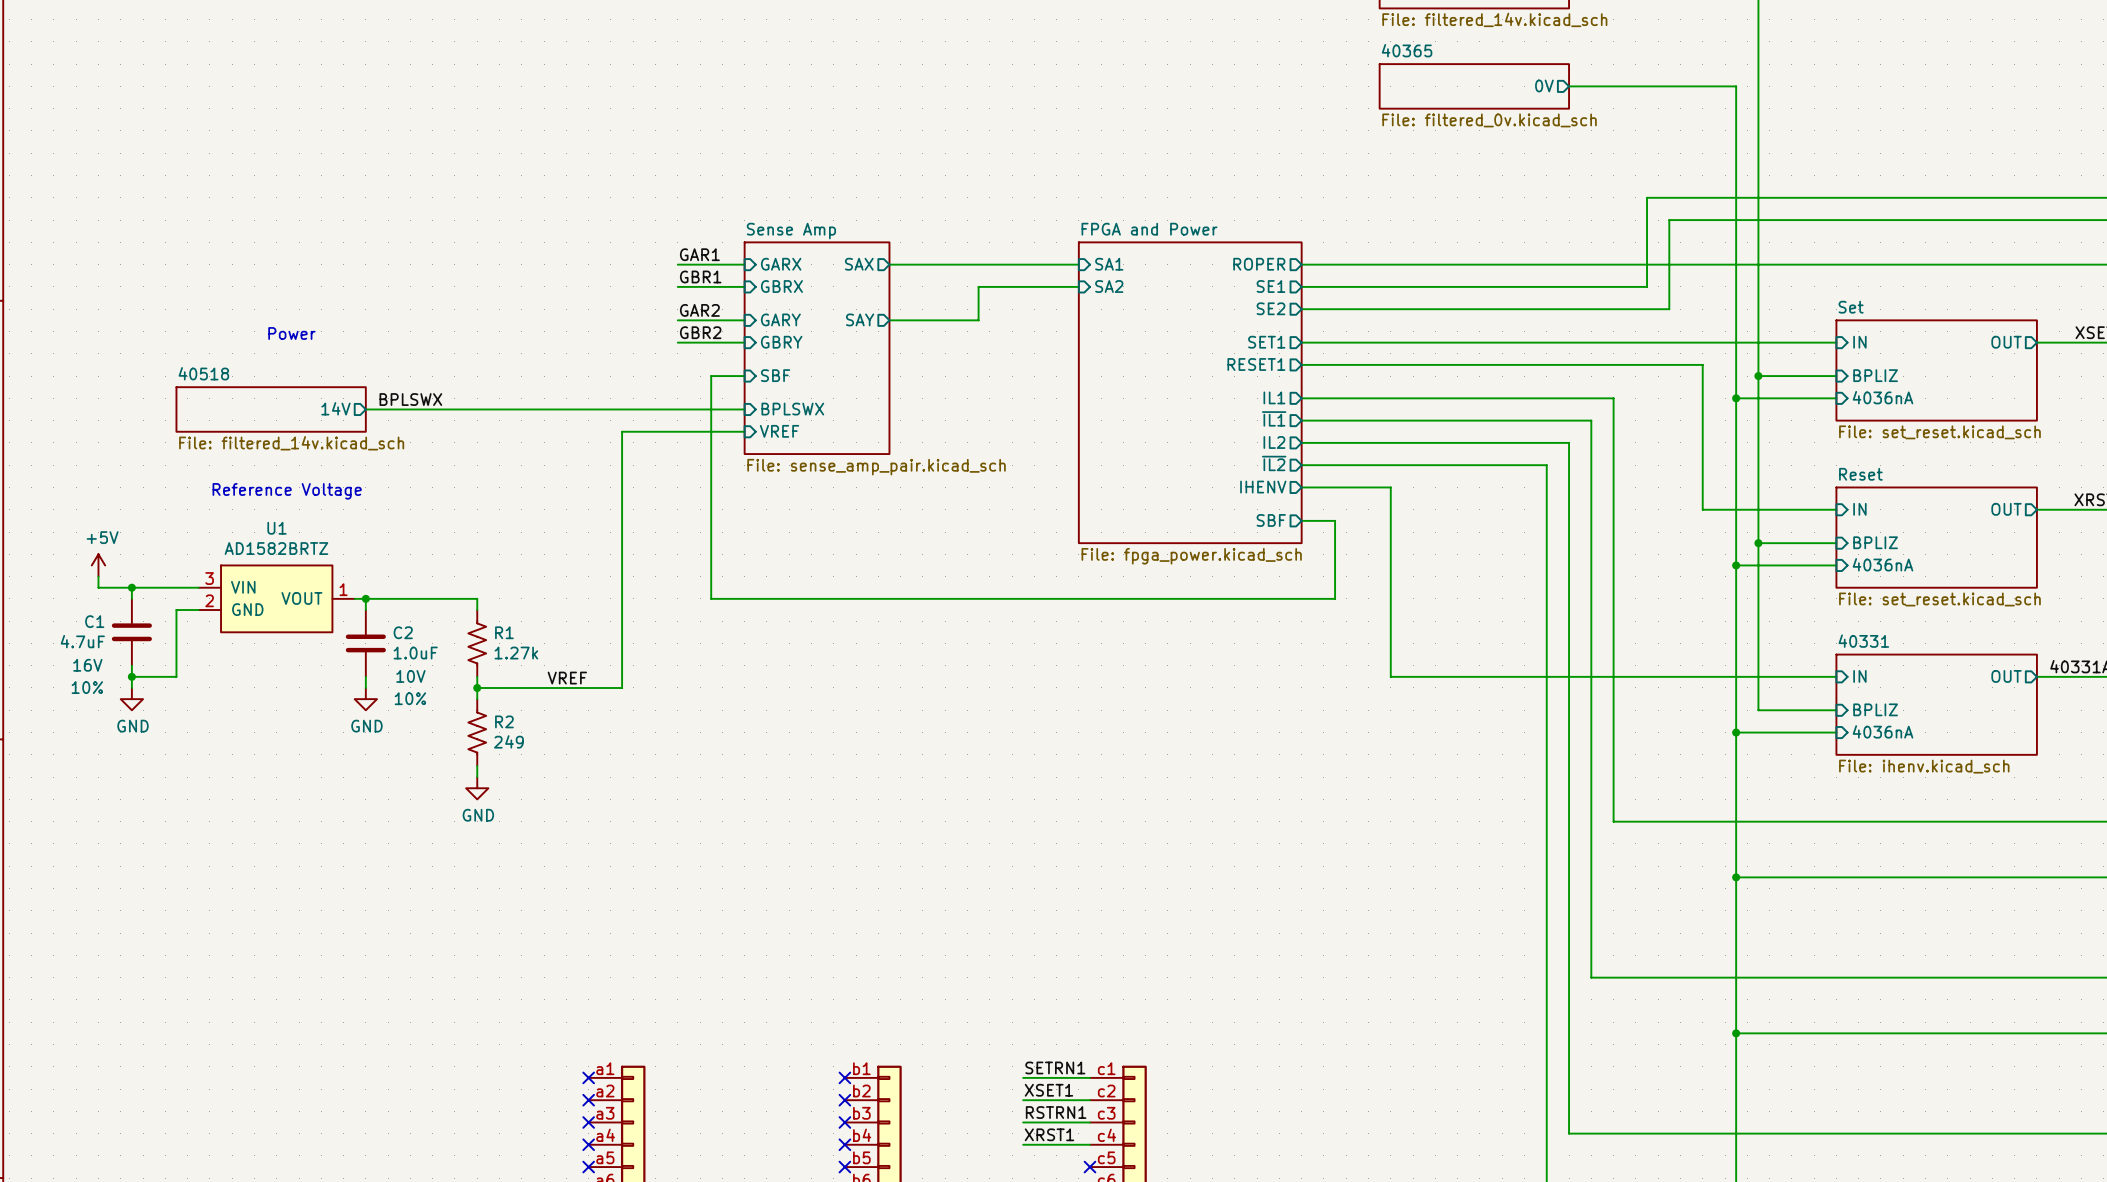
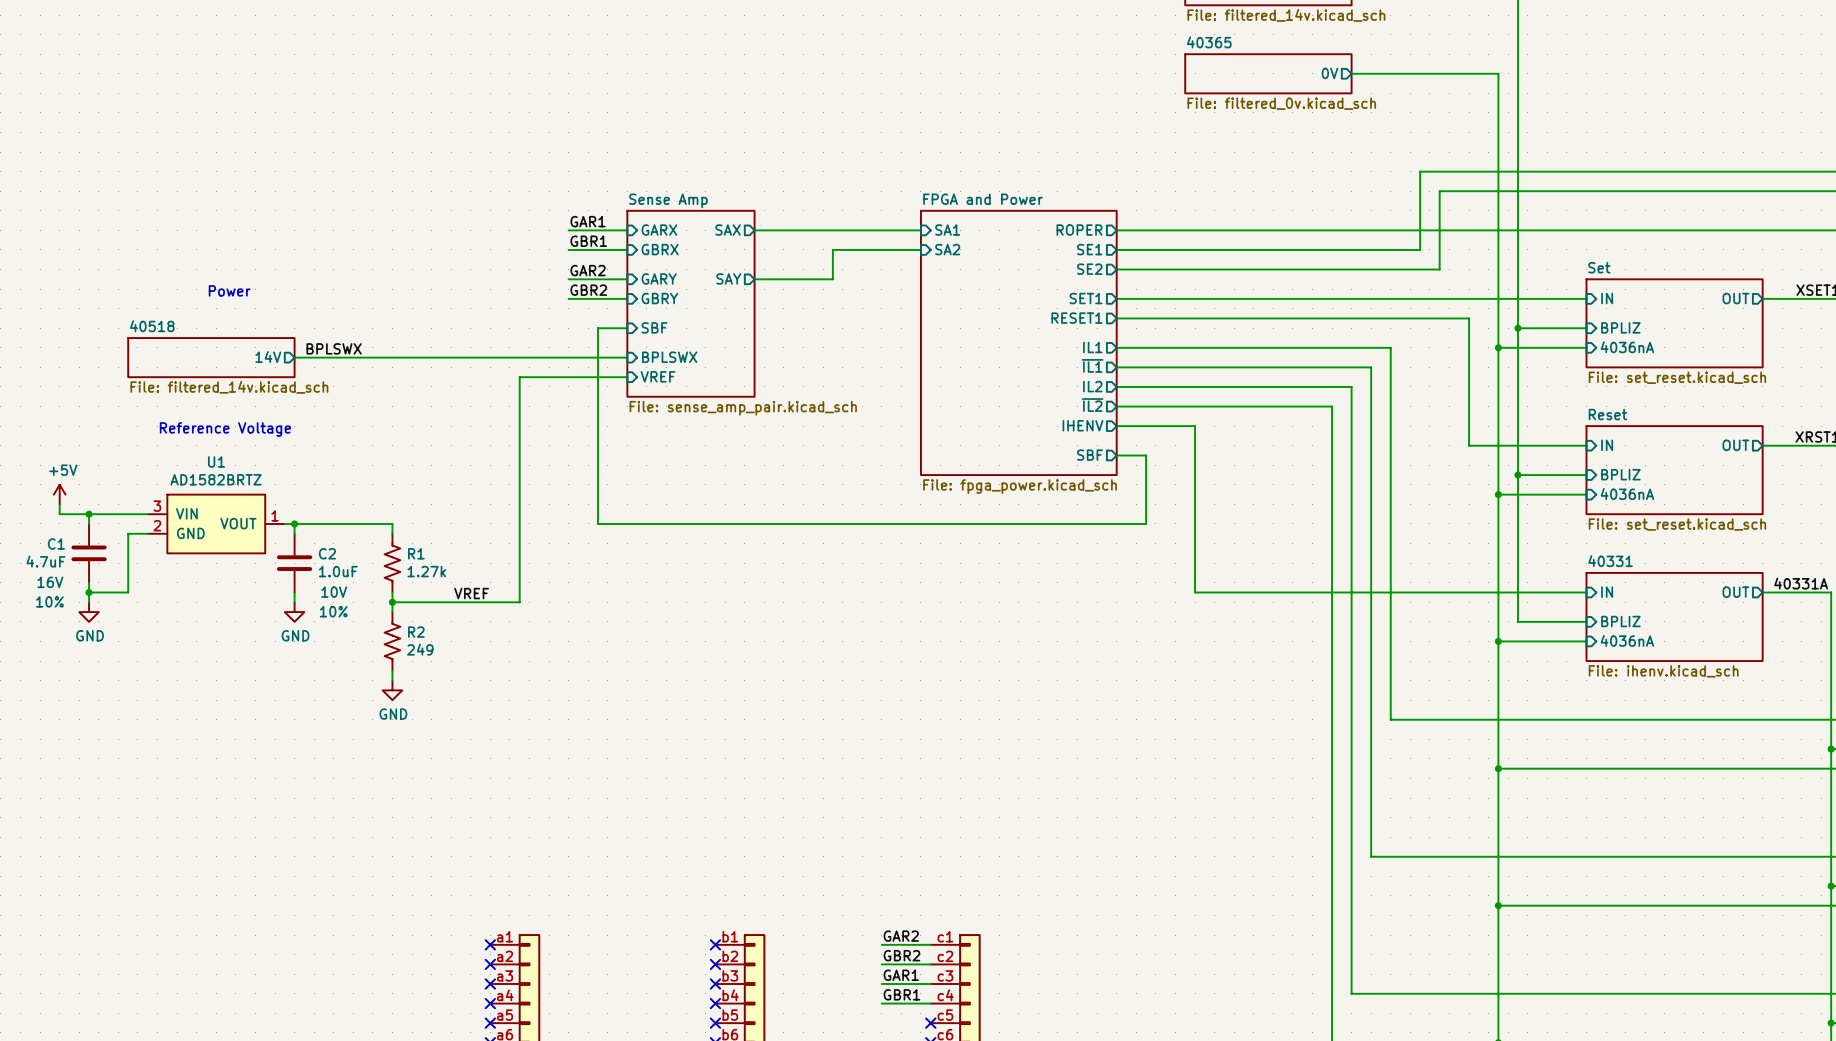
label: SETRN1 (1055, 1067) -> none
label: none -> GAR2 (901, 936)
wire: (1023, 1077) (1034, 1077) -> none
label: XSET1 (1048, 1090) -> none
label: none -> GBR2 (901, 955)
wire: (1023, 1100) (1034, 1100) -> none
label: RSTRN1 (1056, 1112) -> none
label: none -> GAR1 (901, 975)
wire: (1023, 1122) (1034, 1122) -> none
label: XRST1 (1049, 1134) -> none
label: none -> GBR1 (901, 994)
wire: (1023, 1144) (1034, 1144) -> none

